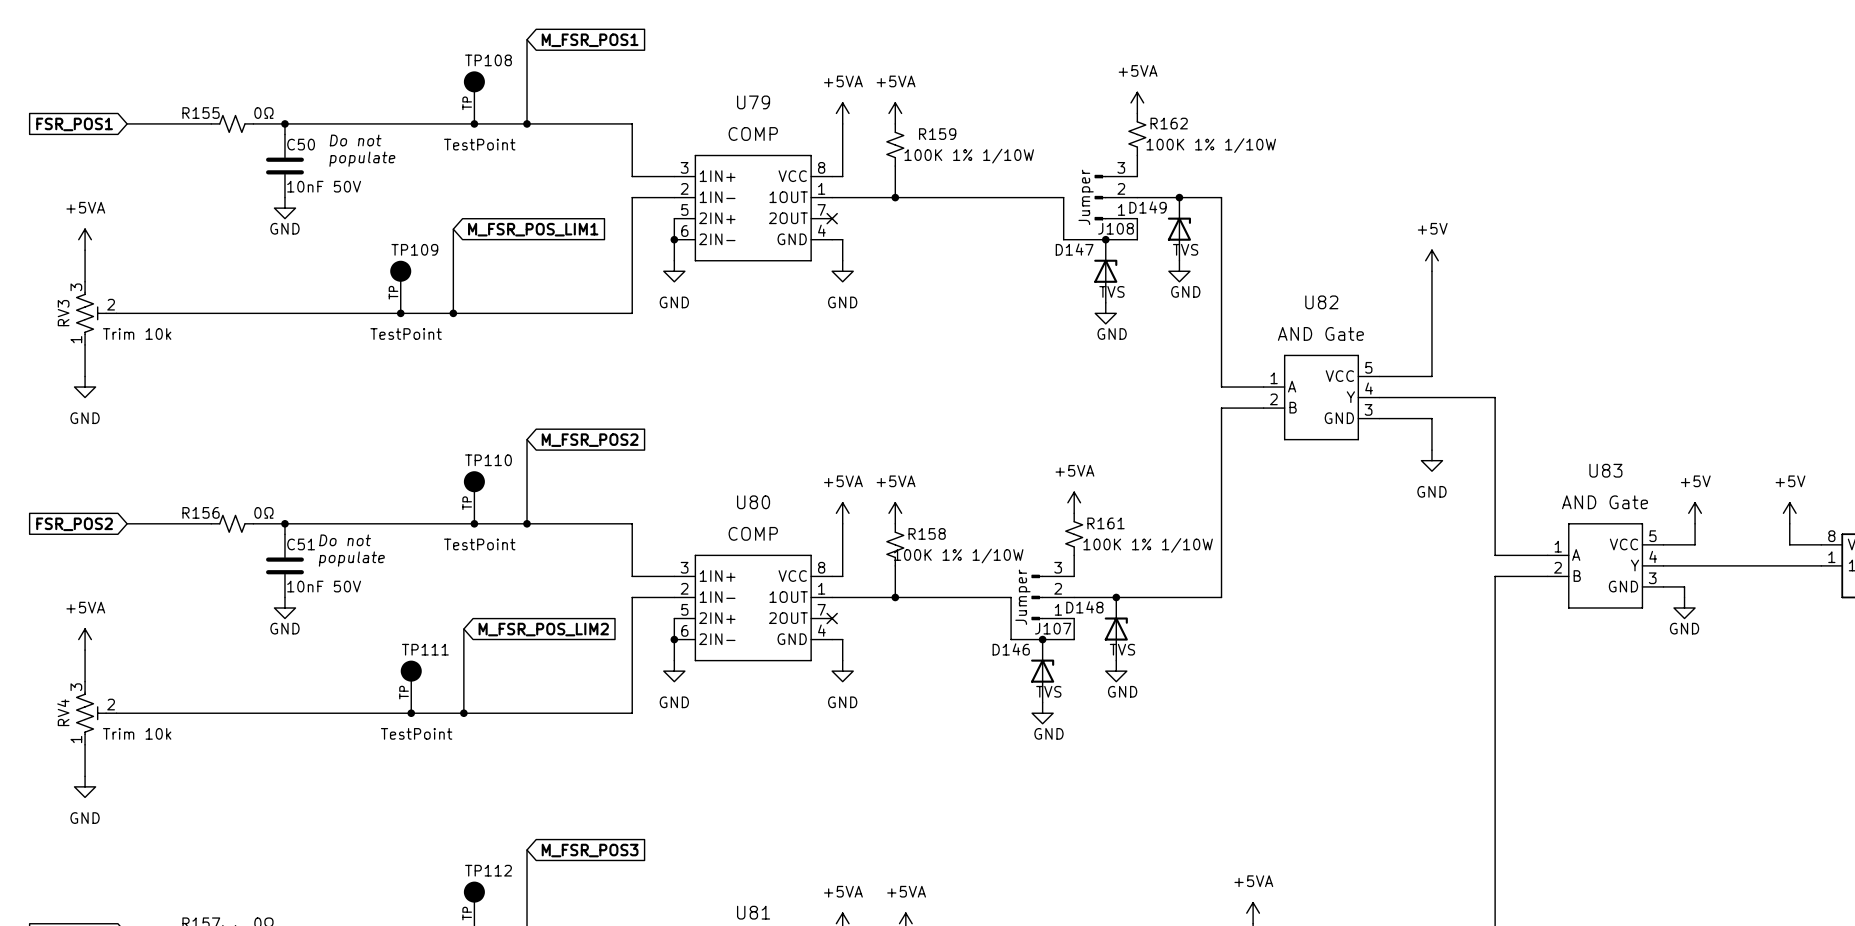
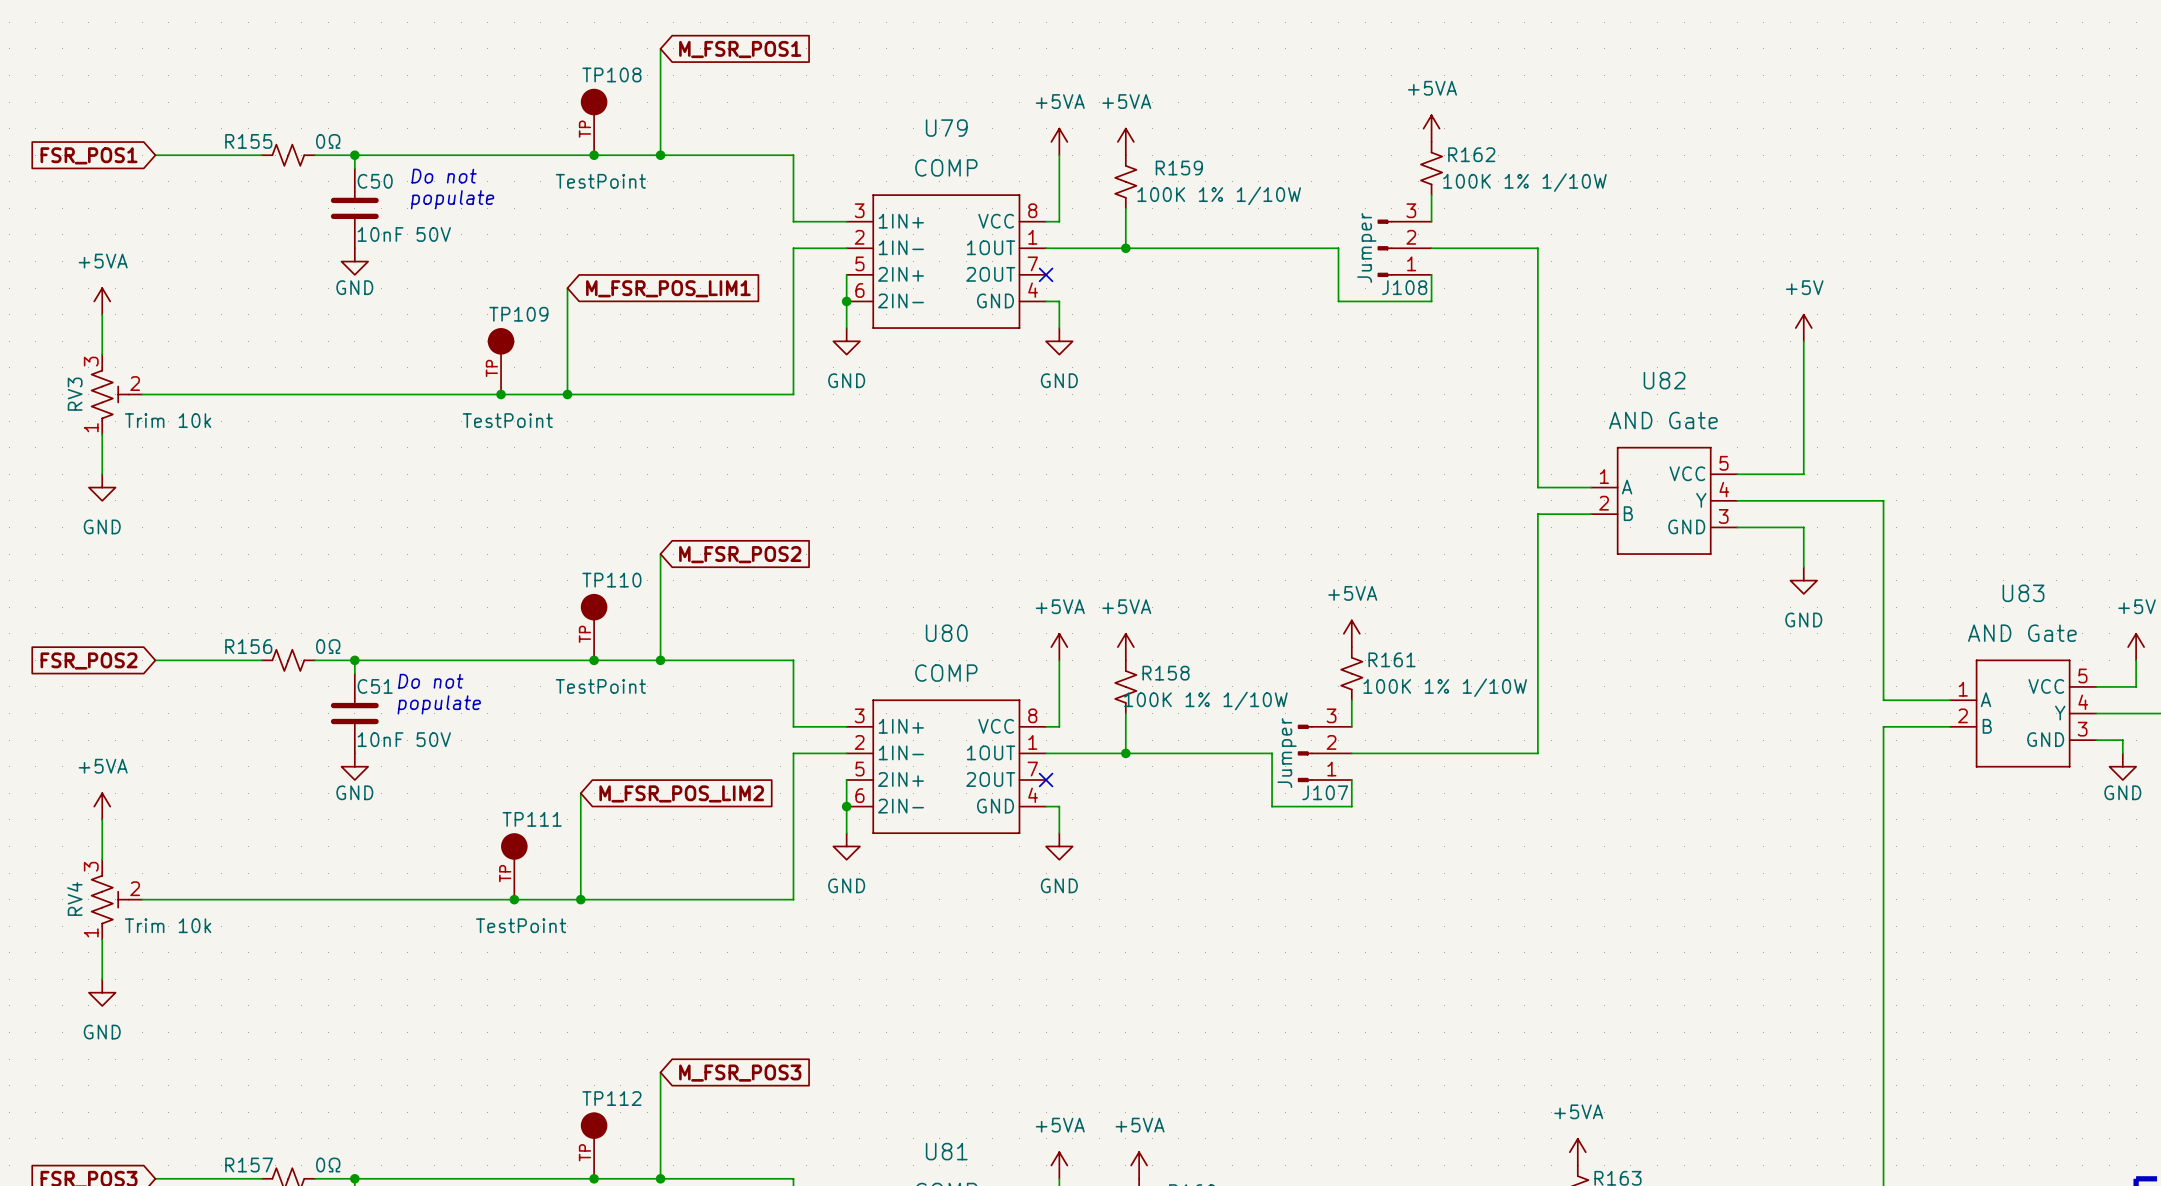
junction: (1179, 197) -> none
D149: TVS (1179, 229) -> none
junction: (1105, 239) -> none
D147: TVS (1105, 271) -> none
power symbol: GND (1179, 271) -> none
power symbol: GND (1105, 313) -> none
junction: (1116, 597) -> none
D148: TVS (1116, 629) -> none
junction: (1042, 639) -> none
D146: TVS (1042, 671) -> none
power symbol: GND (1116, 671) -> none
power symbol: GND (1042, 713) -> none

